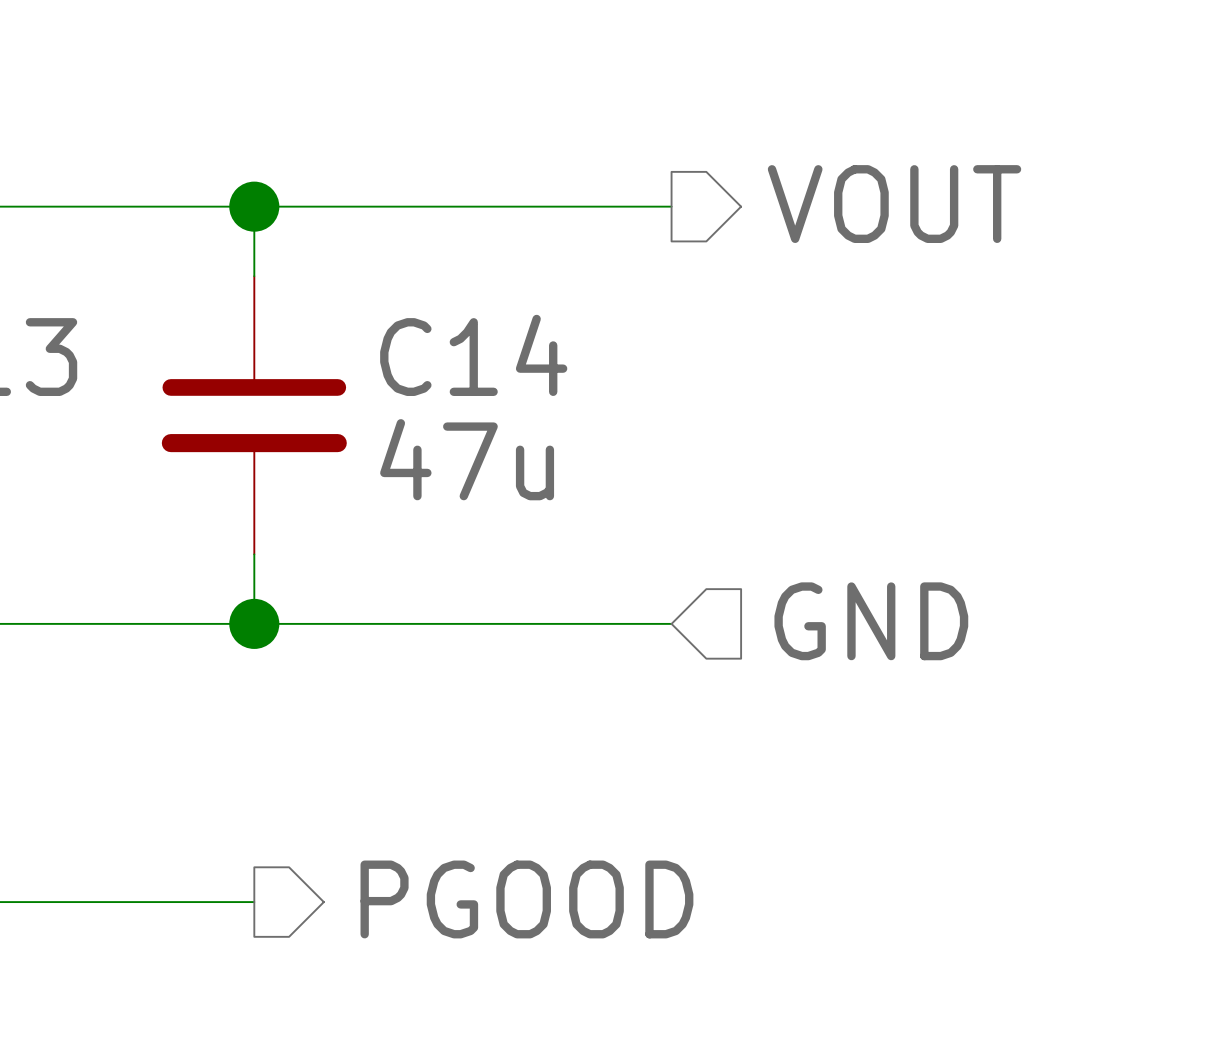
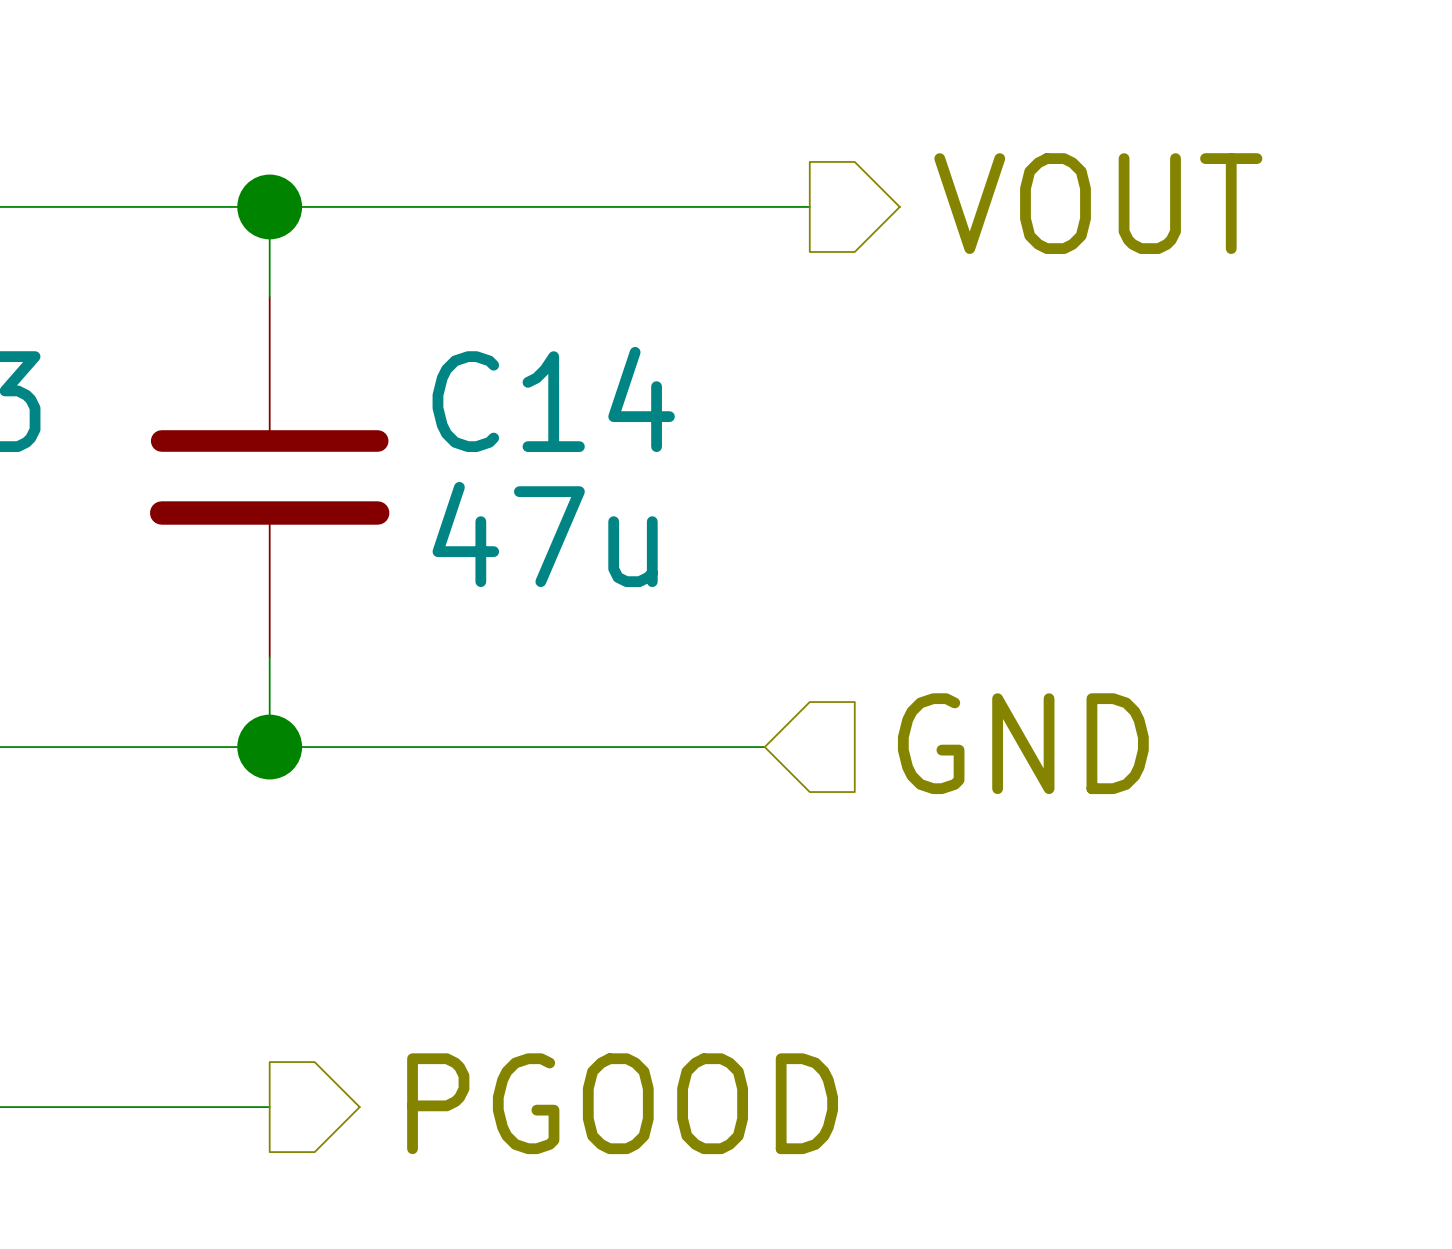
hierarchical label position: GND (871, 621) -> GND (1023, 743)
wire: (636, 623) (671, 623) -> none

